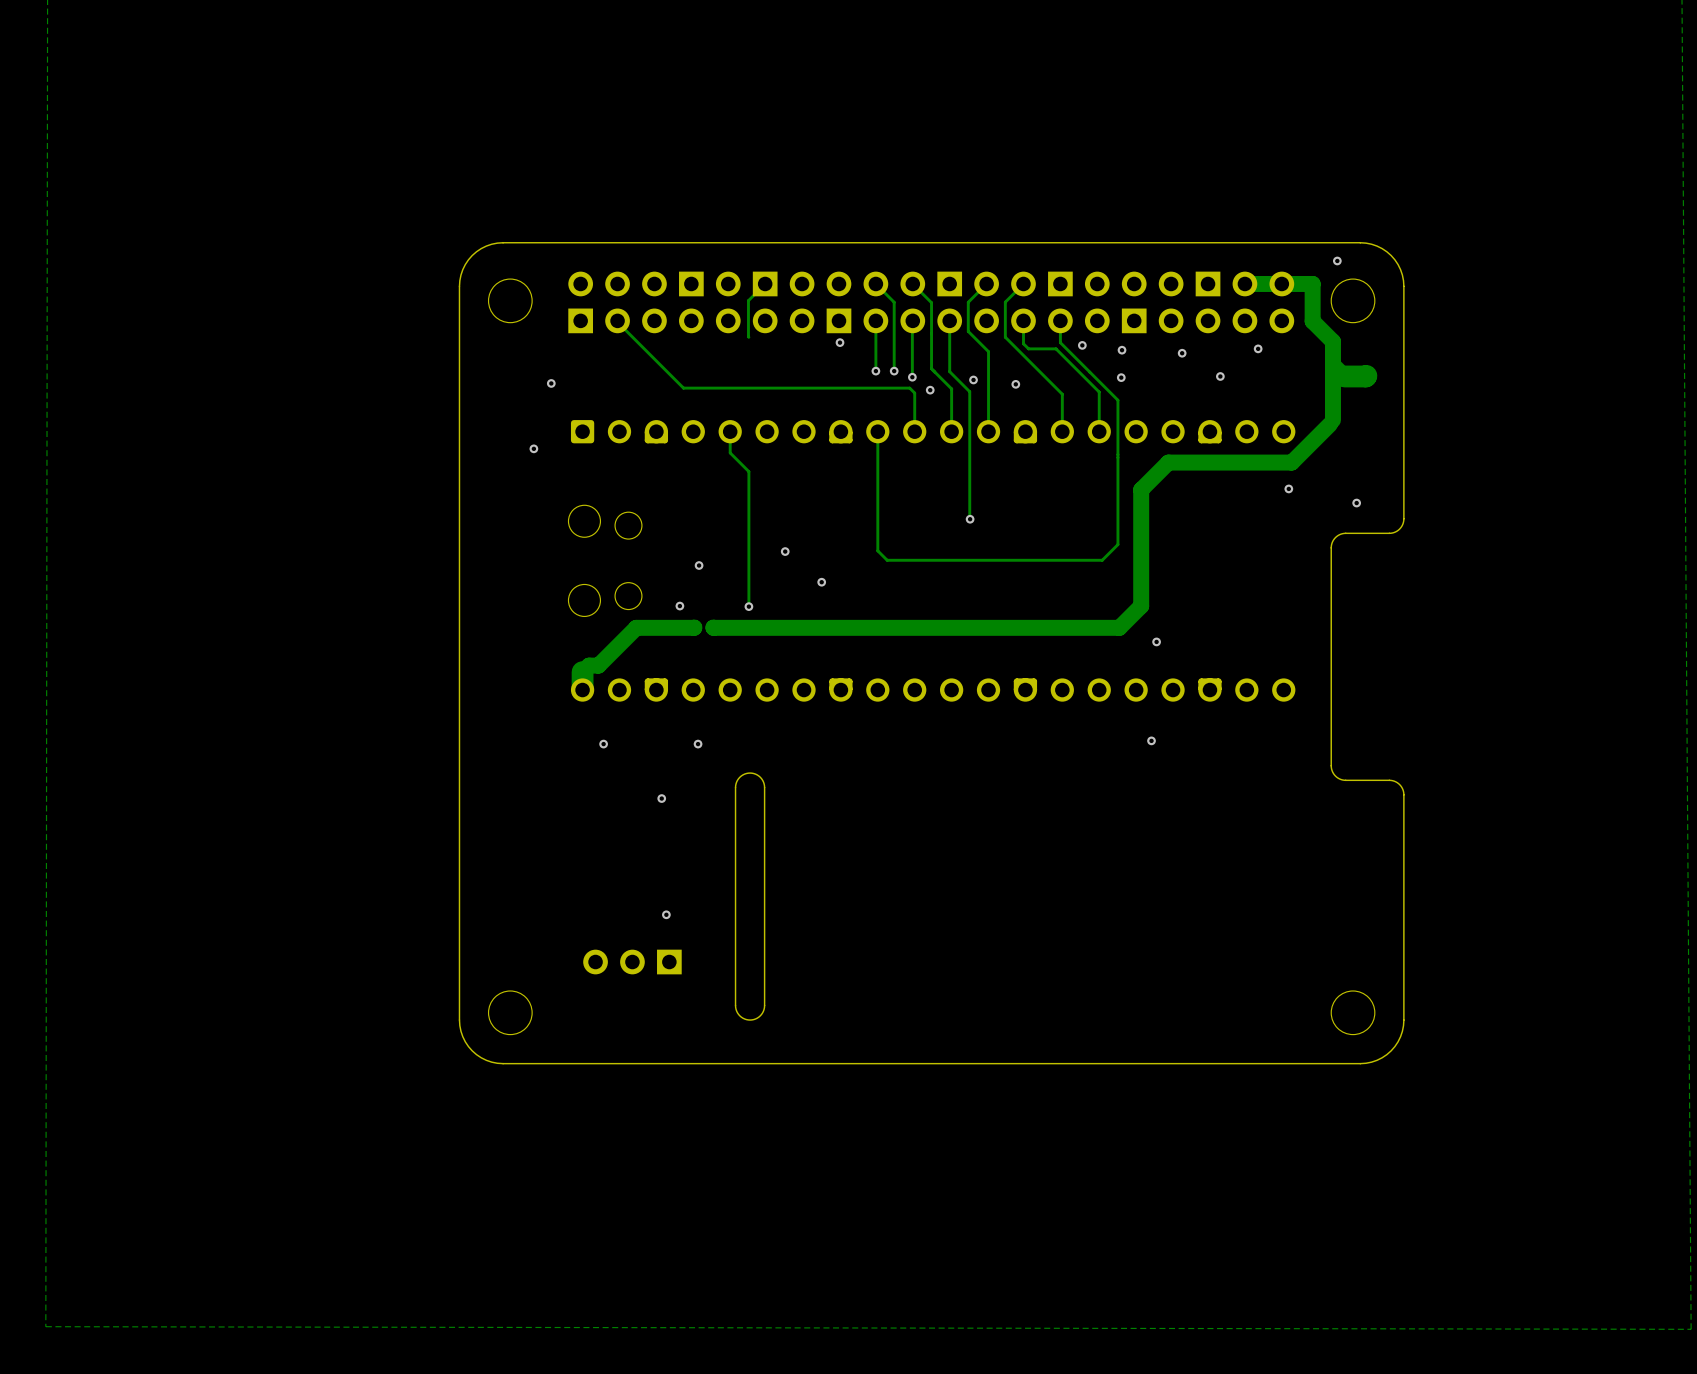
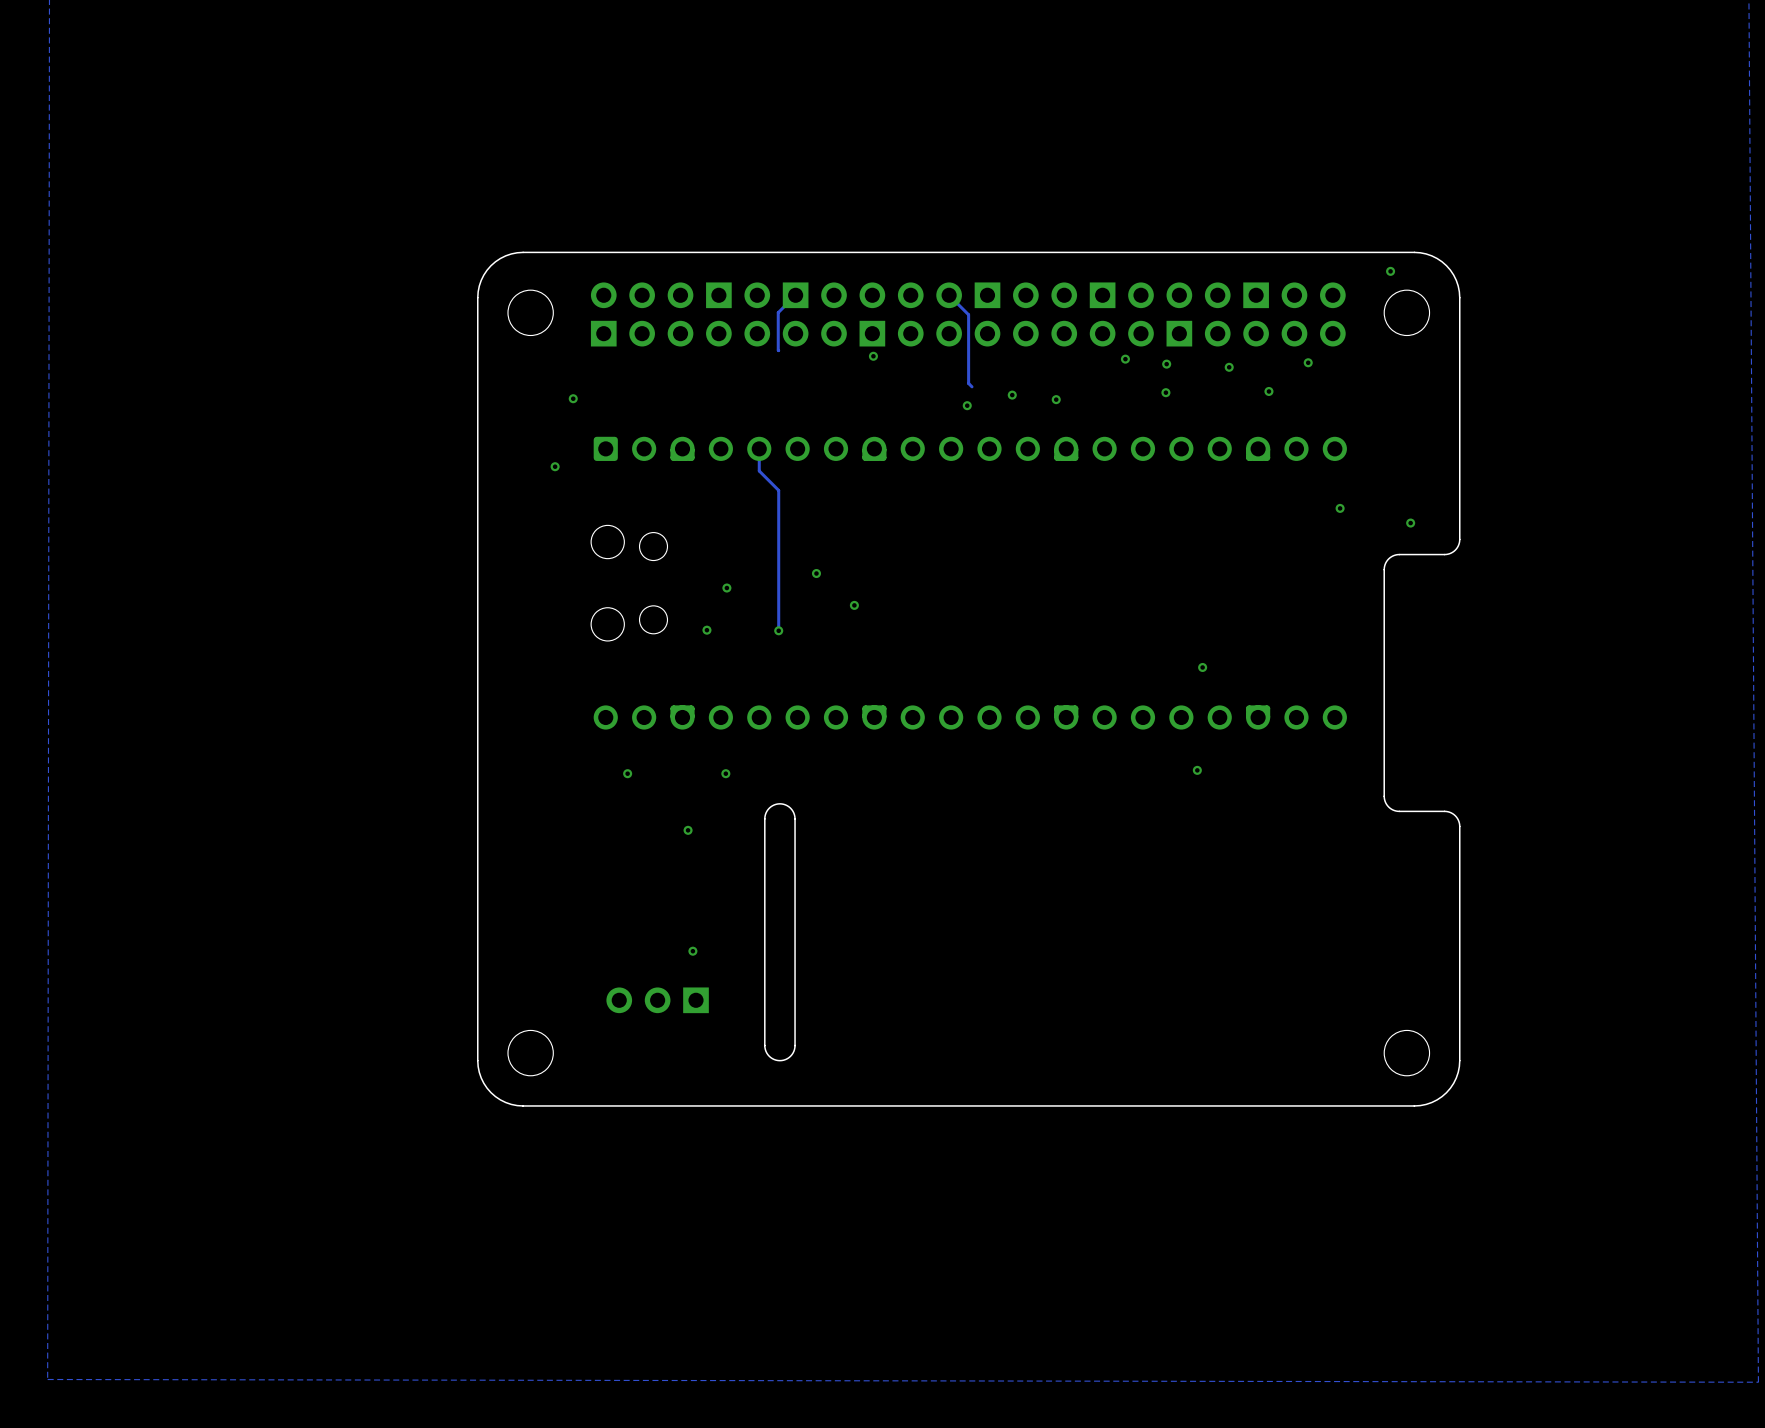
track: (875, 283) (894, 302) (894, 371) -> none
track: (986, 283) (968, 302) (968, 331) (988, 351) (988, 431) -> none
track: (1023, 283) (1005, 302) (1005, 337) (1062, 394) (1062, 431) -> none
track: (1244, 283) (1312, 283) (1312, 321) (1332, 341) (1332, 420) -> none
track: (617, 320) (683, 388) (909, 388) (914, 393) (914, 431) -> none
track: (875, 320) (875, 371) -> none
track: (912, 320) (912, 377) -> none
track: (949, 320) (949, 371) (969, 391) (969, 518) -> none
track: (1023, 320) (1023, 343) (1028, 348) (1056, 348) (1099, 392) (1099, 431) -> none
track: (1060, 320) (1060, 342) (1117, 400) (1117, 544) (1102, 560) (887, 560) (877, 550) (877, 431) -> none
track: (1332, 364) (1344, 376) (1366, 375) -> none
via: (875, 371) -> none
via: (894, 371) -> none
track: (934, 372) (951, 388) -> none
via: (912, 377) -> none
track: (951, 389) (951, 431) -> none
track: (1329, 424) (1291, 462) (1168, 462) (1141, 489) (1141, 606) (1119, 627) (713, 627) -> none
via: (970, 519) -> none
track: (694, 627) (636, 627) (598, 665) (589, 665) (582, 672) (582, 690) -> none

